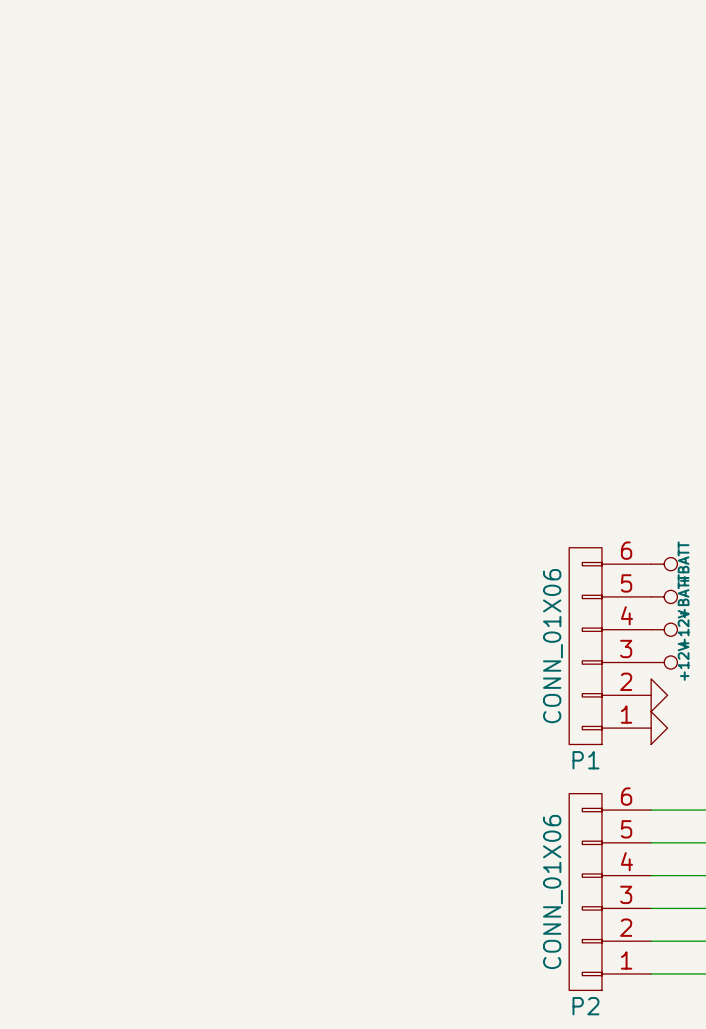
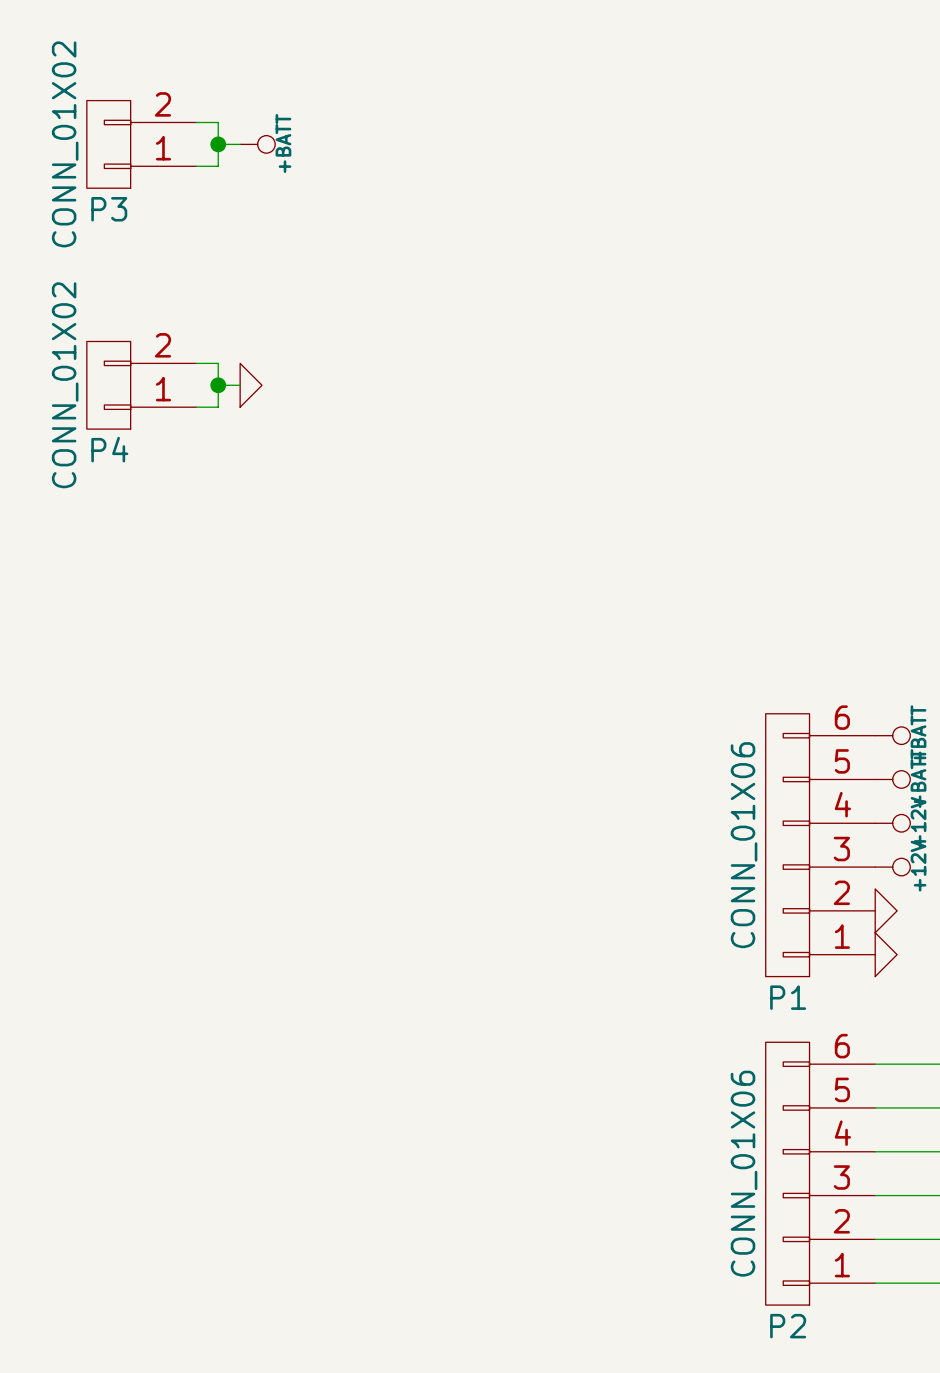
wire: none -> (196, 122) (218, 122) (218, 166) (196, 166)
P3: none -> CONN_01X02 (141, 144)
wire: none -> (218, 144) (240, 144)
junction: none -> (218, 144)
power symbol: none -> +BATT (257, 144)
wire: none -> (196, 363) (218, 363) (218, 407) (196, 407)
P4: none -> CONN_01X02 (141, 385)
wire: none -> (218, 385) (240, 385)
junction: none -> (218, 385)
power symbol: none -> (251, 385)

